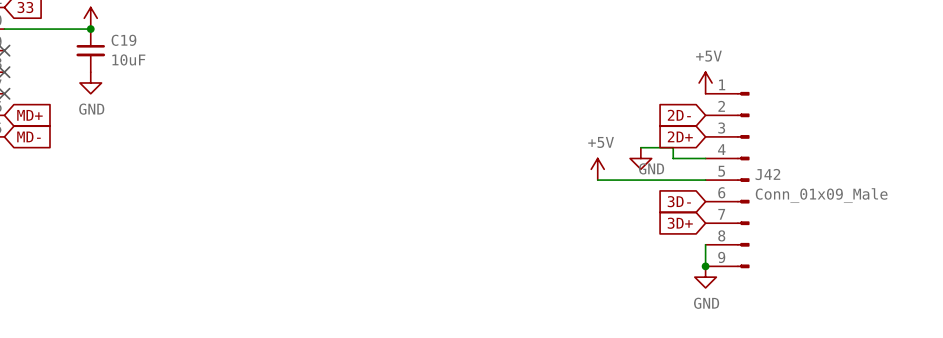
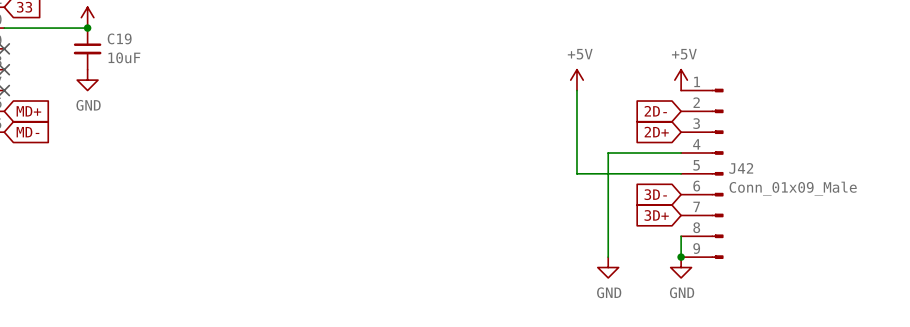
wire: none -> (576, 90) (576, 173)
wire: (640, 147) (673, 147) (673, 158) -> (608, 257) (608, 153) (649, 153)
power symbol position: GND (640, 158) -> GND (608, 267)
power symbol text position: GND (651, 168) -> GND (609, 292)
power symbol position: +5V (597, 169) -> +5V (576, 80)

